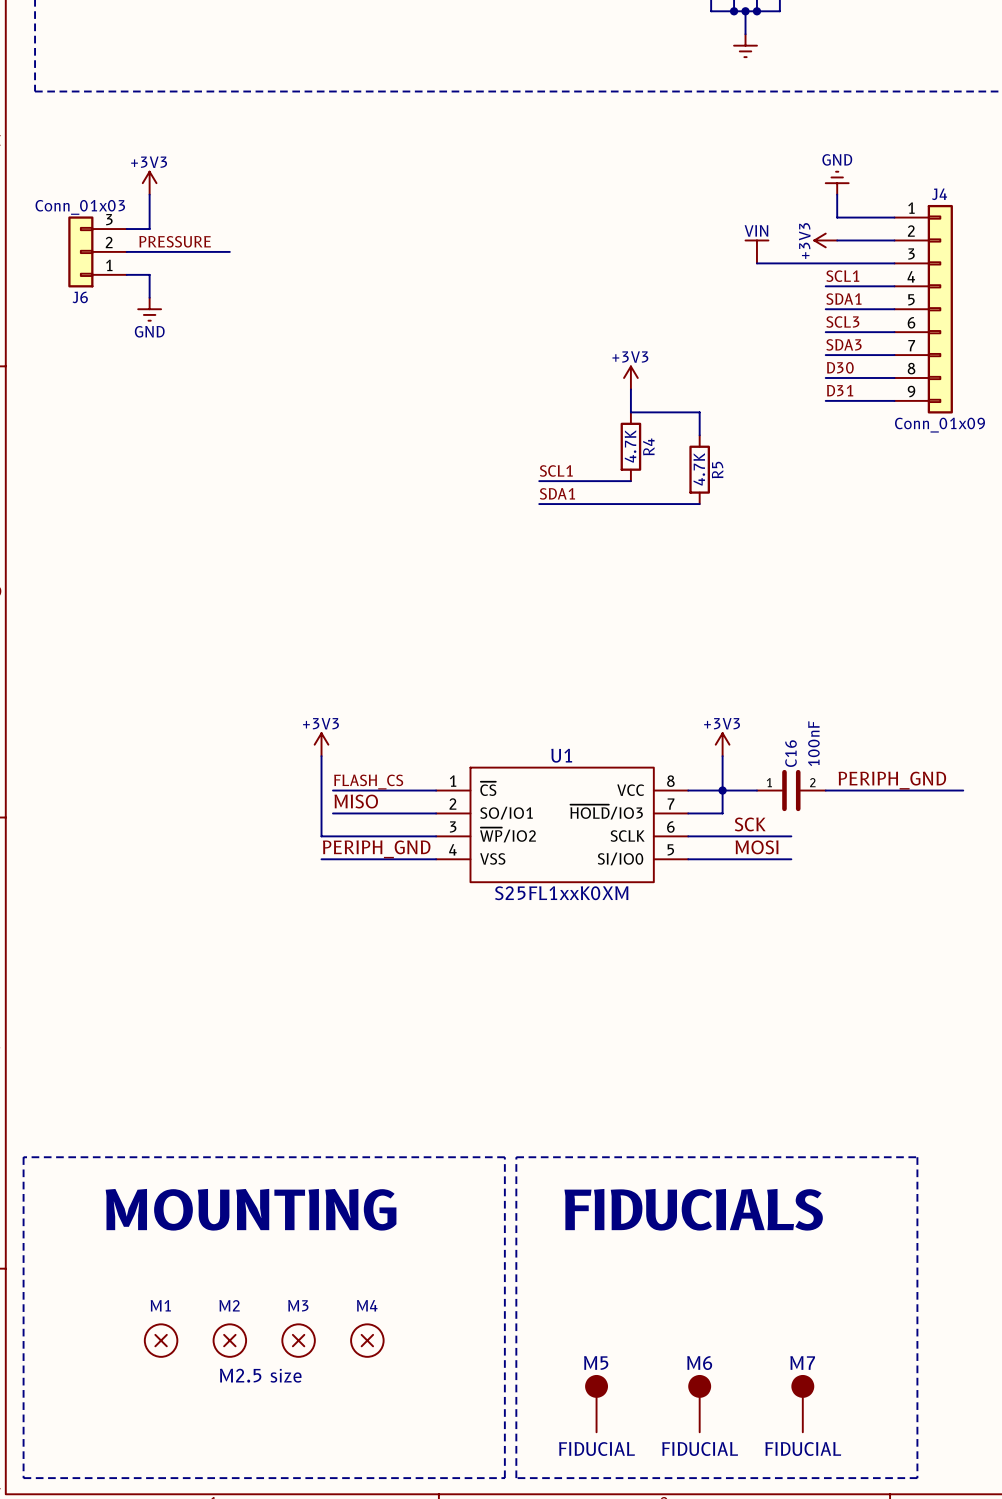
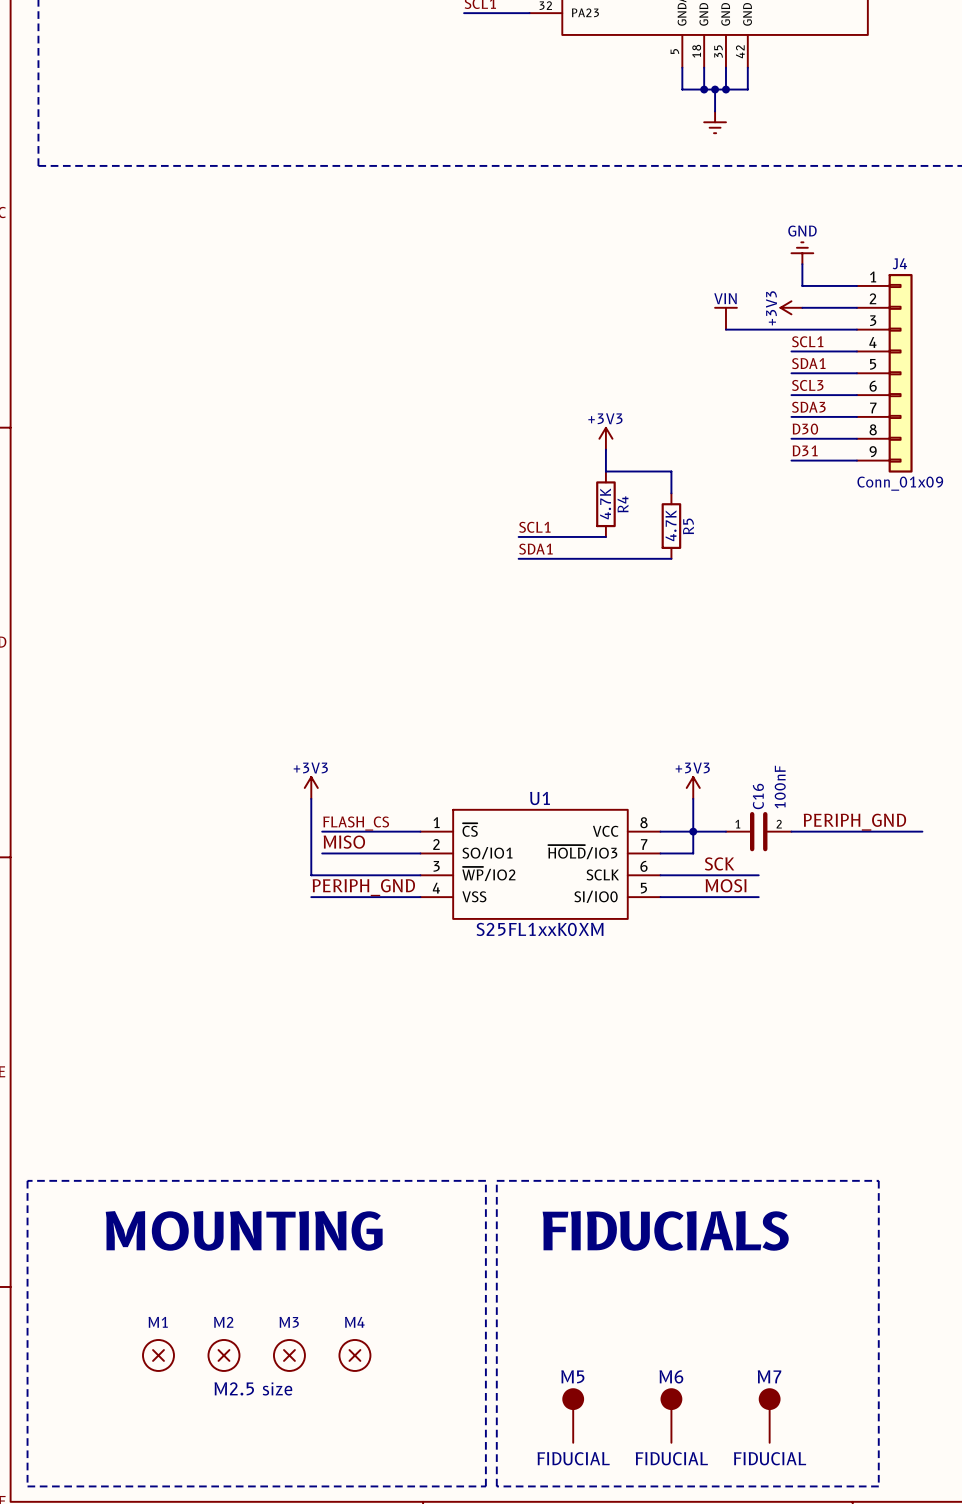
power symbol: +3V3 (149, 183) -> none
wire: (149, 194) (149, 229) (126, 229) -> none
label: PRESSURE (175, 241) -> none
J6: Conn_01x03 (97, 251) -> none
wire: (126, 251) (229, 251) -> none
wire: (126, 274) (149, 274) (149, 297) -> none
power symbol: GND (149, 309) -> none

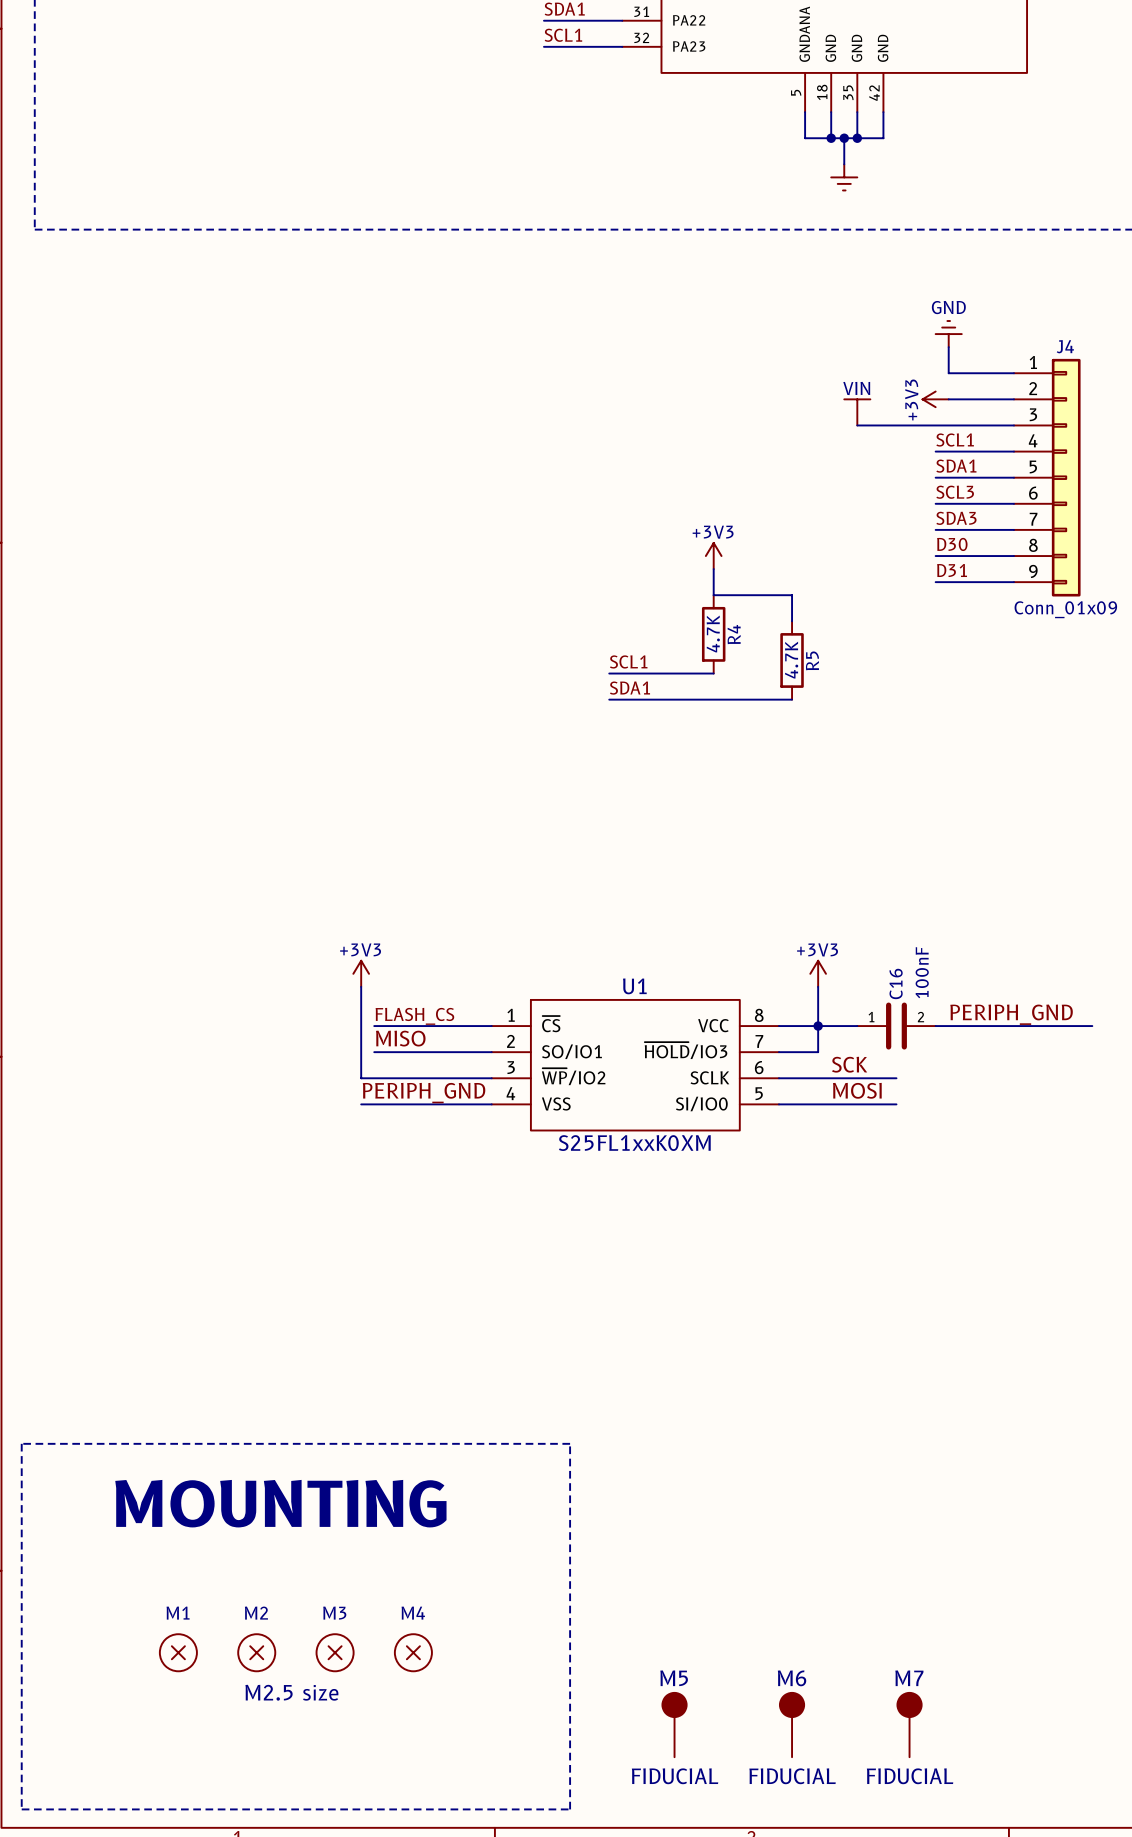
line: (496, 1180) (496, 1486) (878, 1486) (878, 1180) (496, 1180) -> none
text: FIDUCIALS (665, 1230) -> none

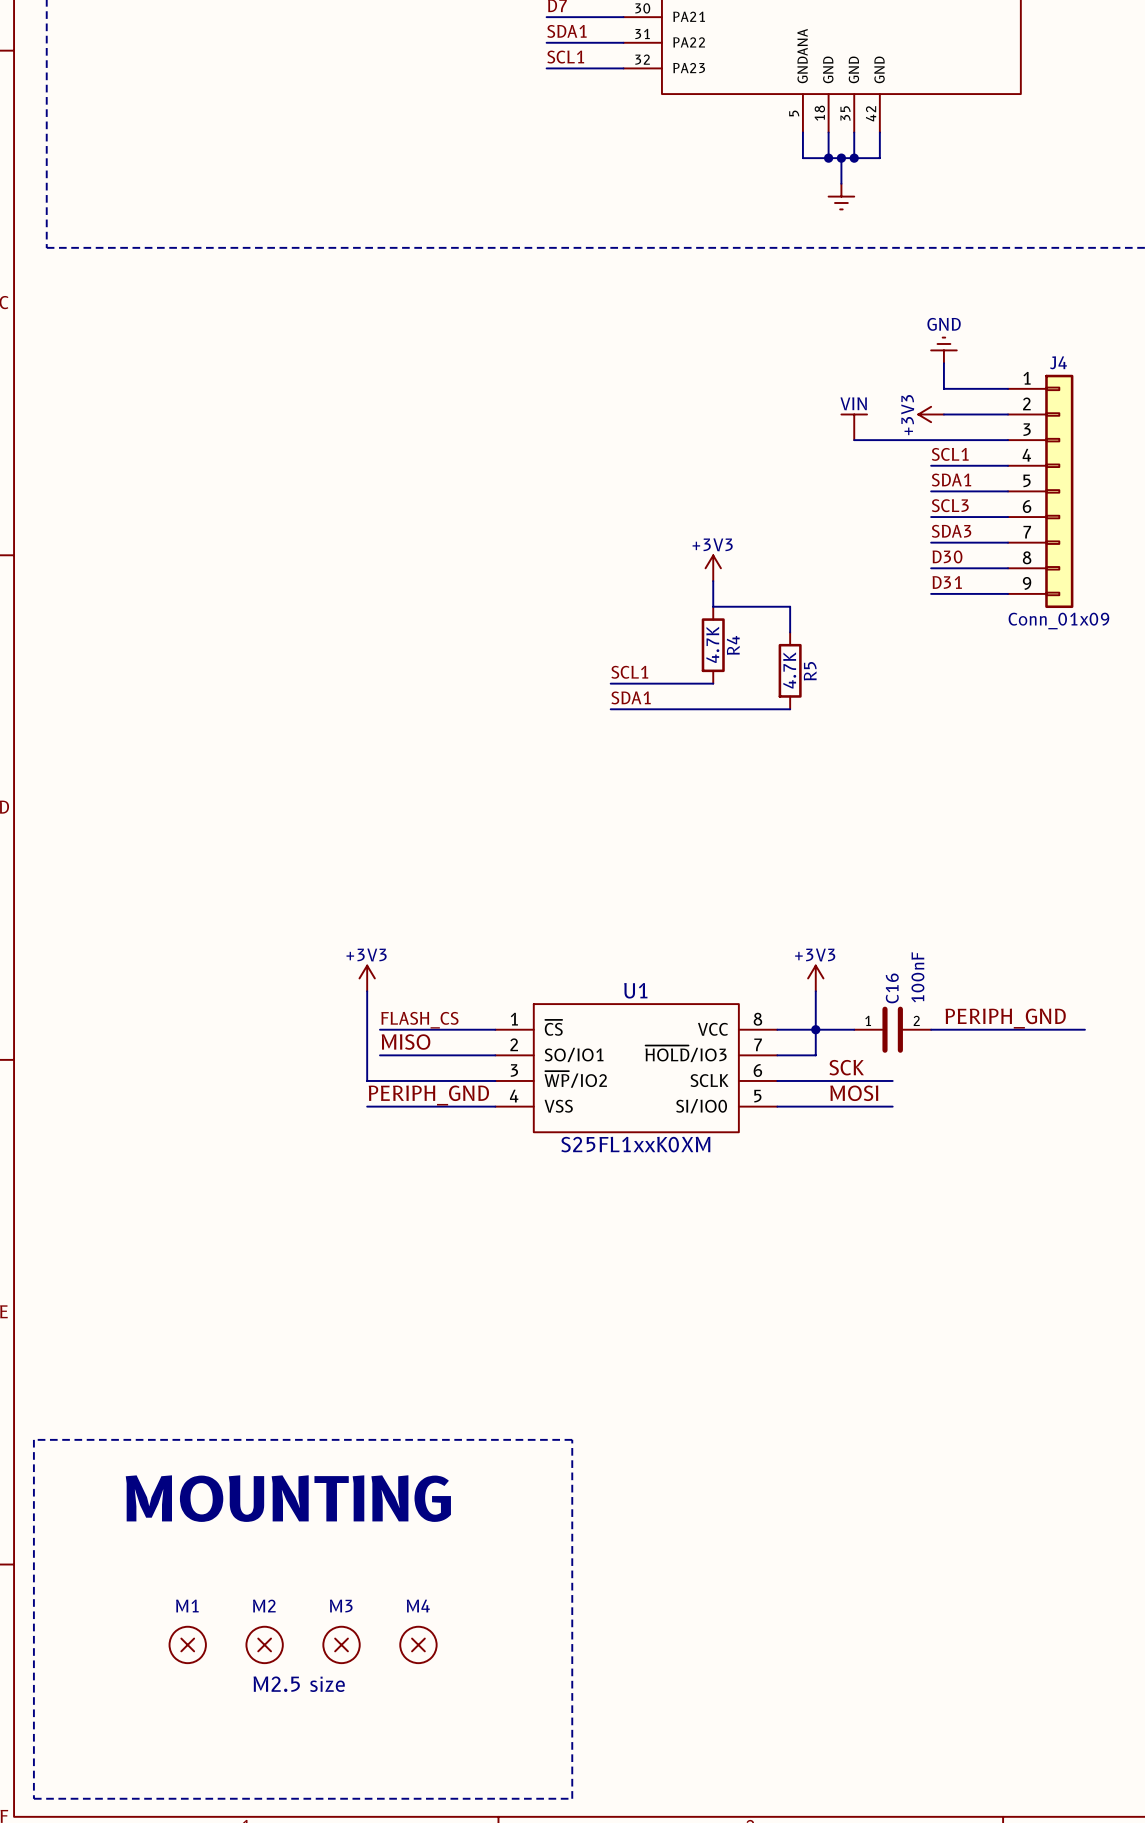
M5: FIDUCIAL (674, 1724) -> none
M6: FIDUCIAL (792, 1724) -> none
M7: FIDUCIAL (909, 1724) -> none

